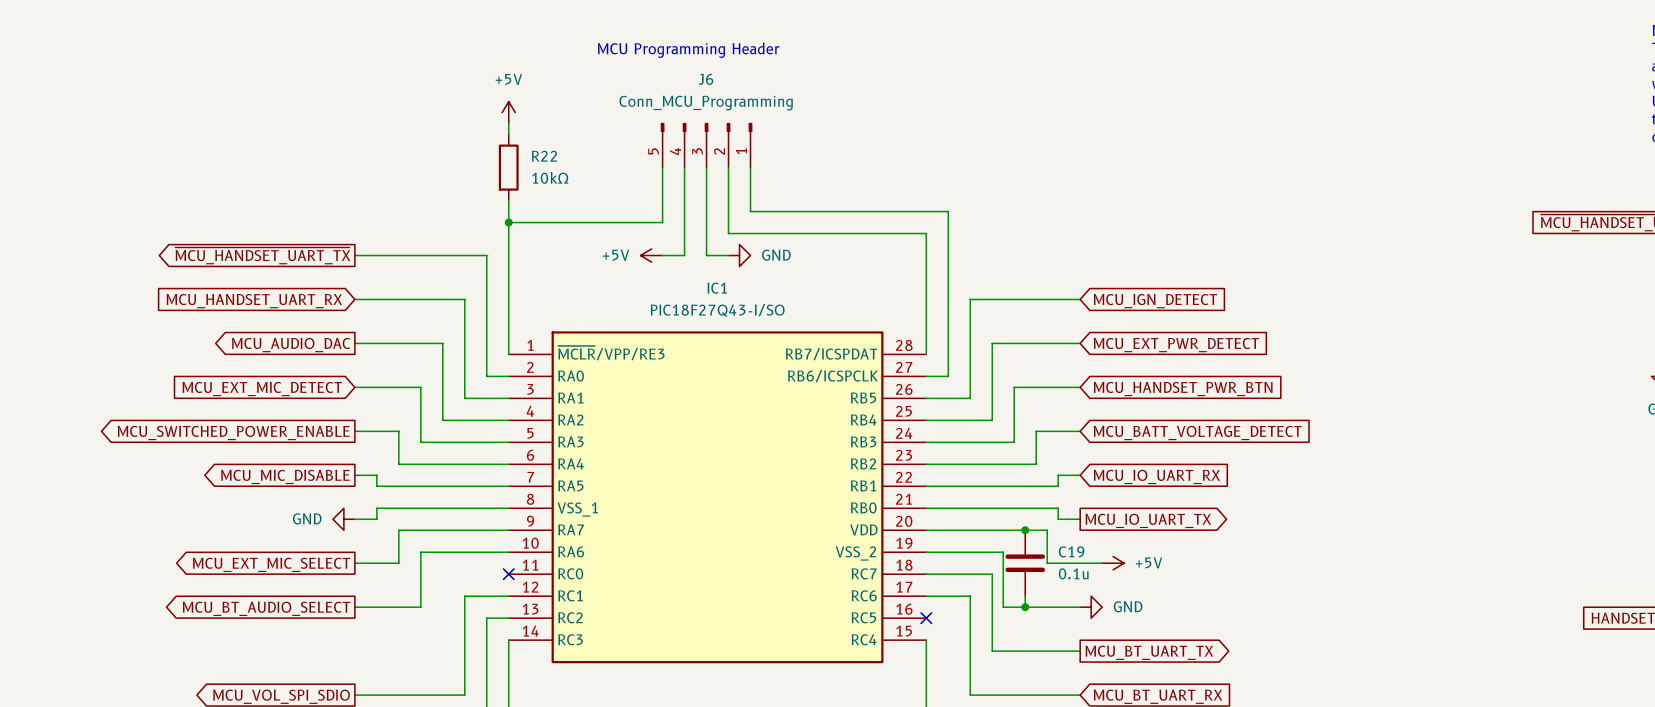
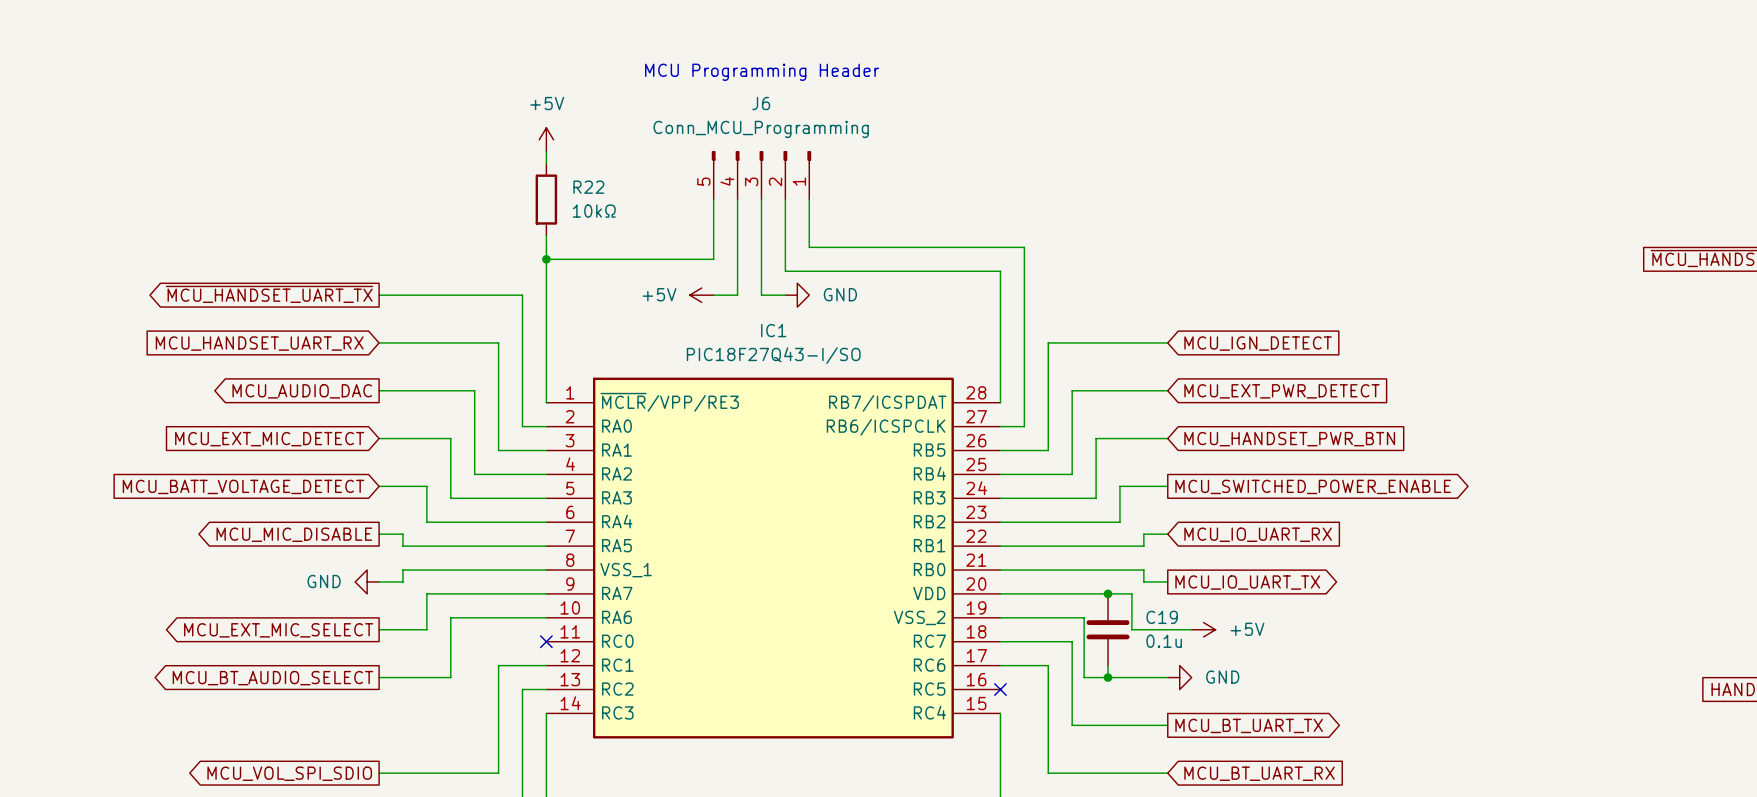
global label shape: output (233, 432) -> input (243, 486)
global label: MCU_SWITCHED_POWER_ENABLE (233, 432) -> MCU_BATT_VOLTAGE_DETECT (243, 486)
global label shape: input (1197, 432) -> output (1313, 486)
global label: MCU_BATT_VOLTAGE_DETECT (1197, 432) -> MCU_SWITCHED_POWER_ENABLE (1313, 486)

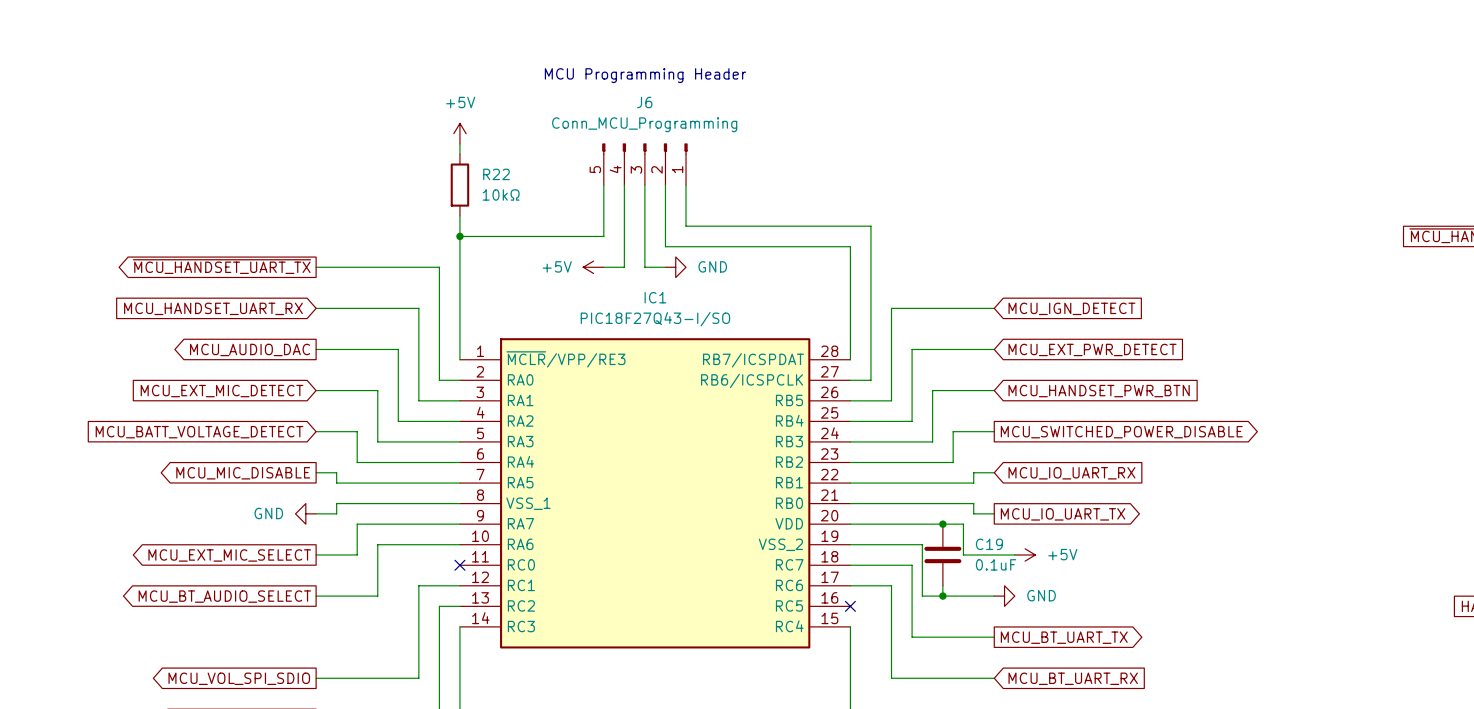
global label: MCU_SWITCHED_POWER_ENABLE (1313, 486) -> MCU_SWITCHED_POWER_DISABLE (1121, 432)
C19 value: 0.1u (1164, 641) -> 0.1uF (996, 564)

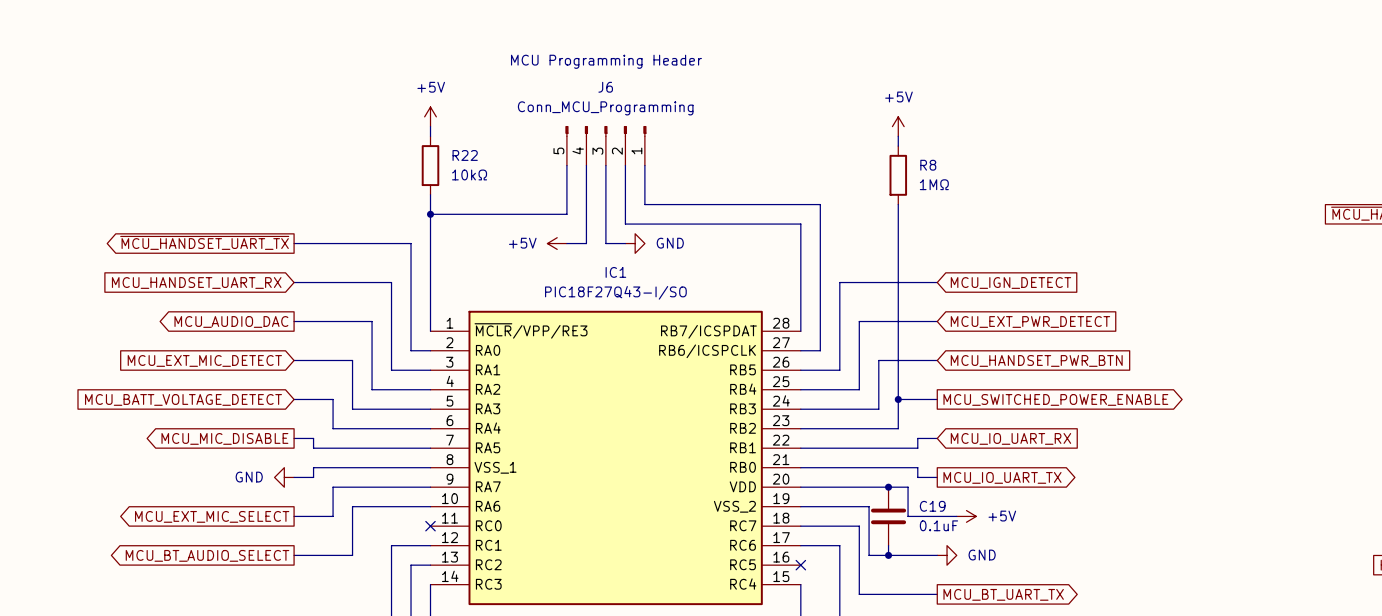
power symbol: none -> +5V (898, 126)
wire: none -> (898, 136) (898, 146)
R8: none -> 1MΩ (898, 175)
wire: none -> (898, 204) (898, 399)
junction: none -> (898, 399)
global label: MCU_SWITCHED_POWER_DISABLE (1121, 432) -> MCU_SWITCHED_POWER_ENABLE (1055, 399)

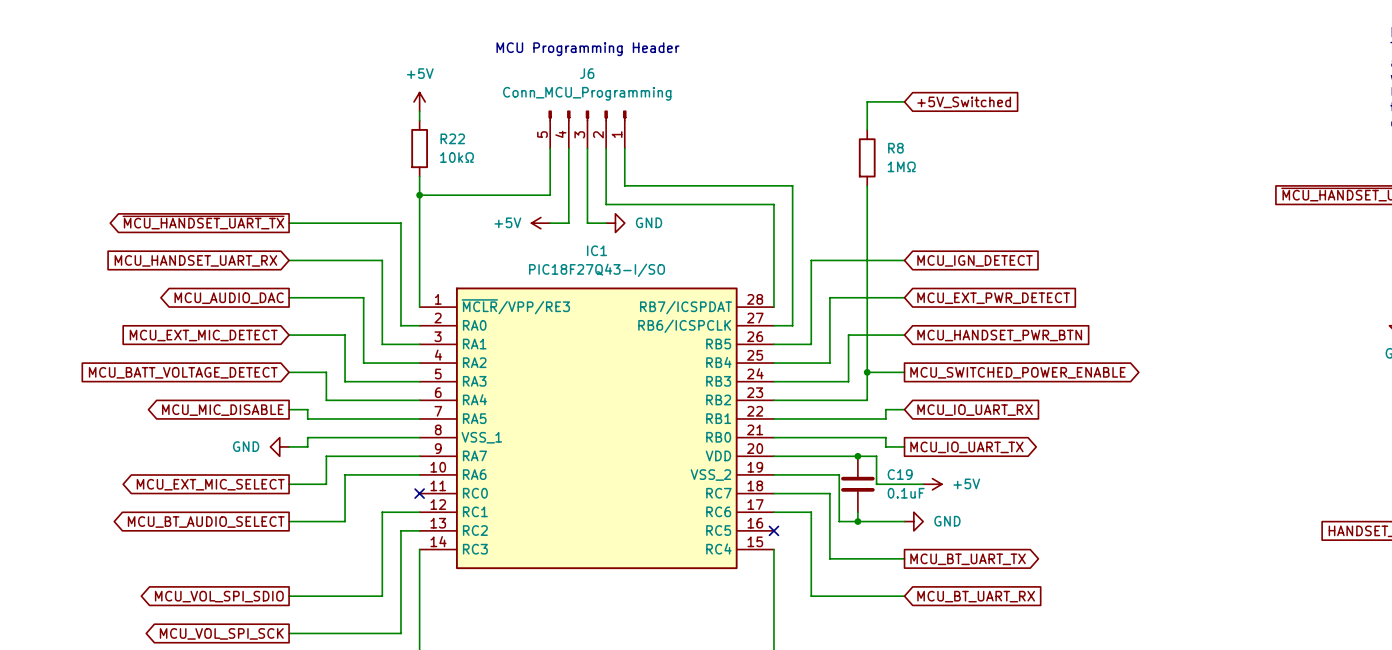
wire: none -> (904, 101) (867, 101) (867, 120)
global label: none -> +5V_Switched (964, 102)
power symbol: +5V (898, 126) -> none

